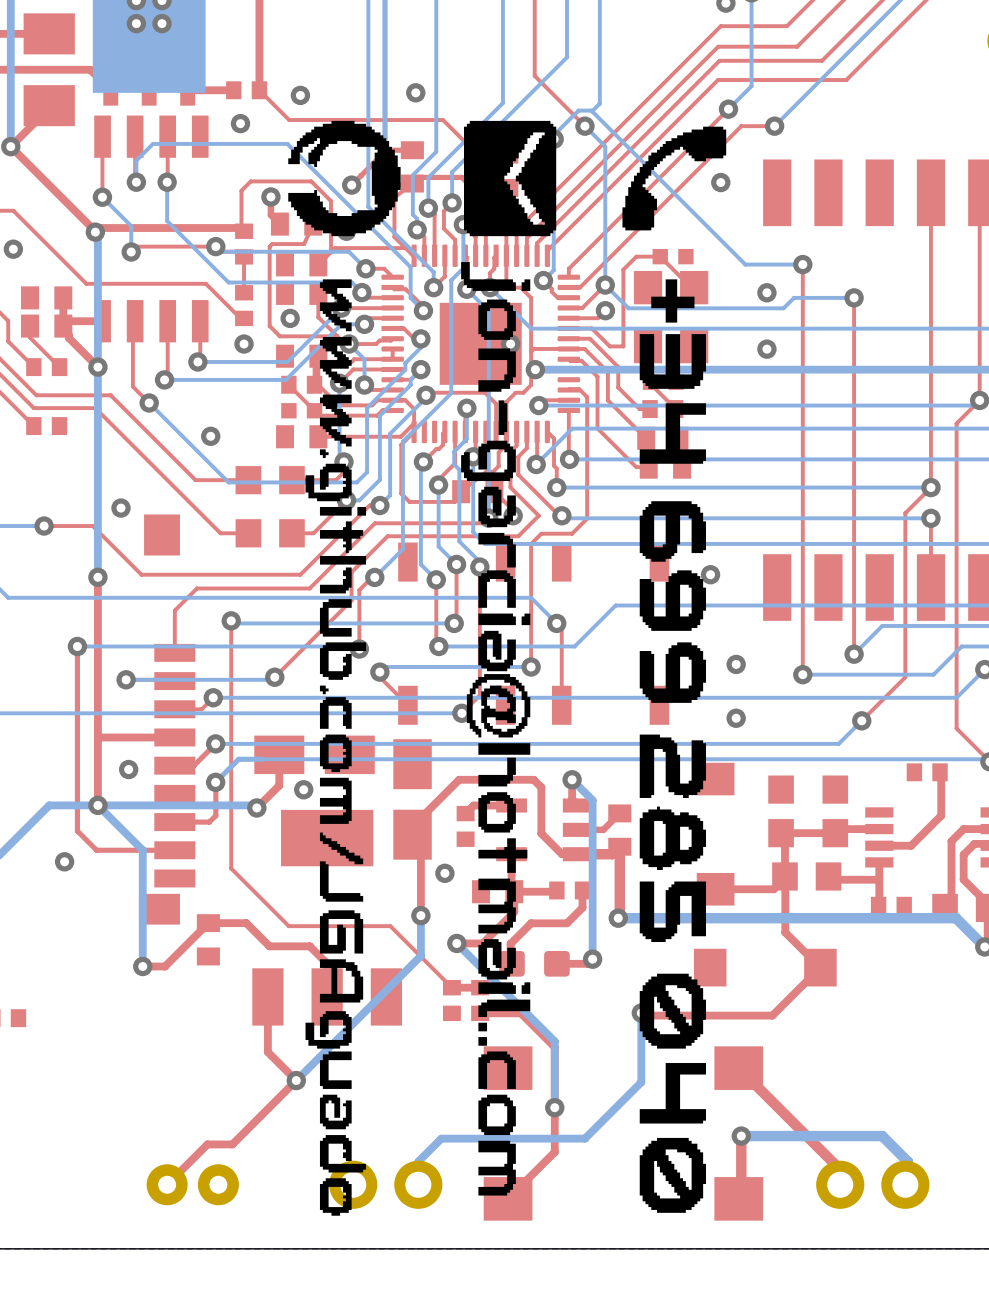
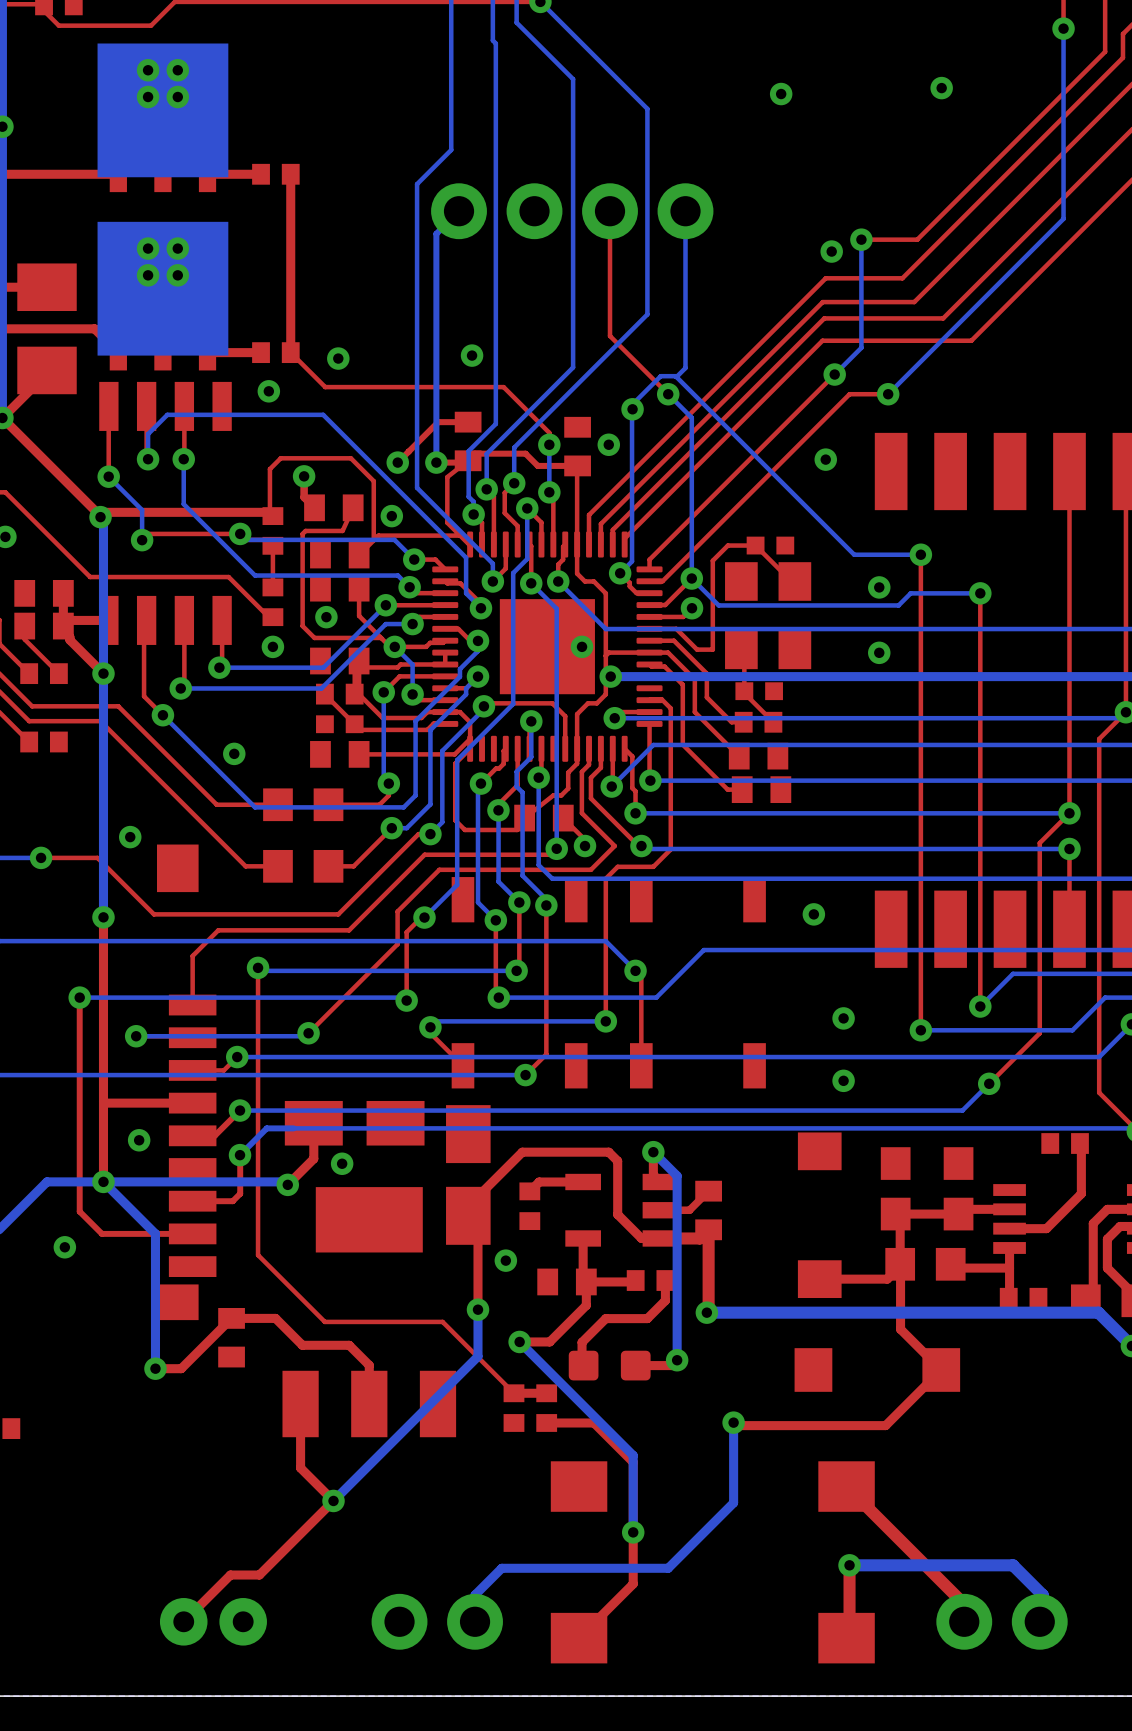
drawing: [288, 120, 401, 237] -> none
drawing: [461, 120, 557, 1196] -> none
drawing: [622, 126, 727, 231] -> none
drawing: [305, 279, 367, 1216] -> none
drawing: [639, 279, 707, 464] -> none
drawing: [639, 501, 707, 703] -> none
drawing: [639, 734, 707, 943] -> none
drawing: [639, 973, 707, 1213] -> none

